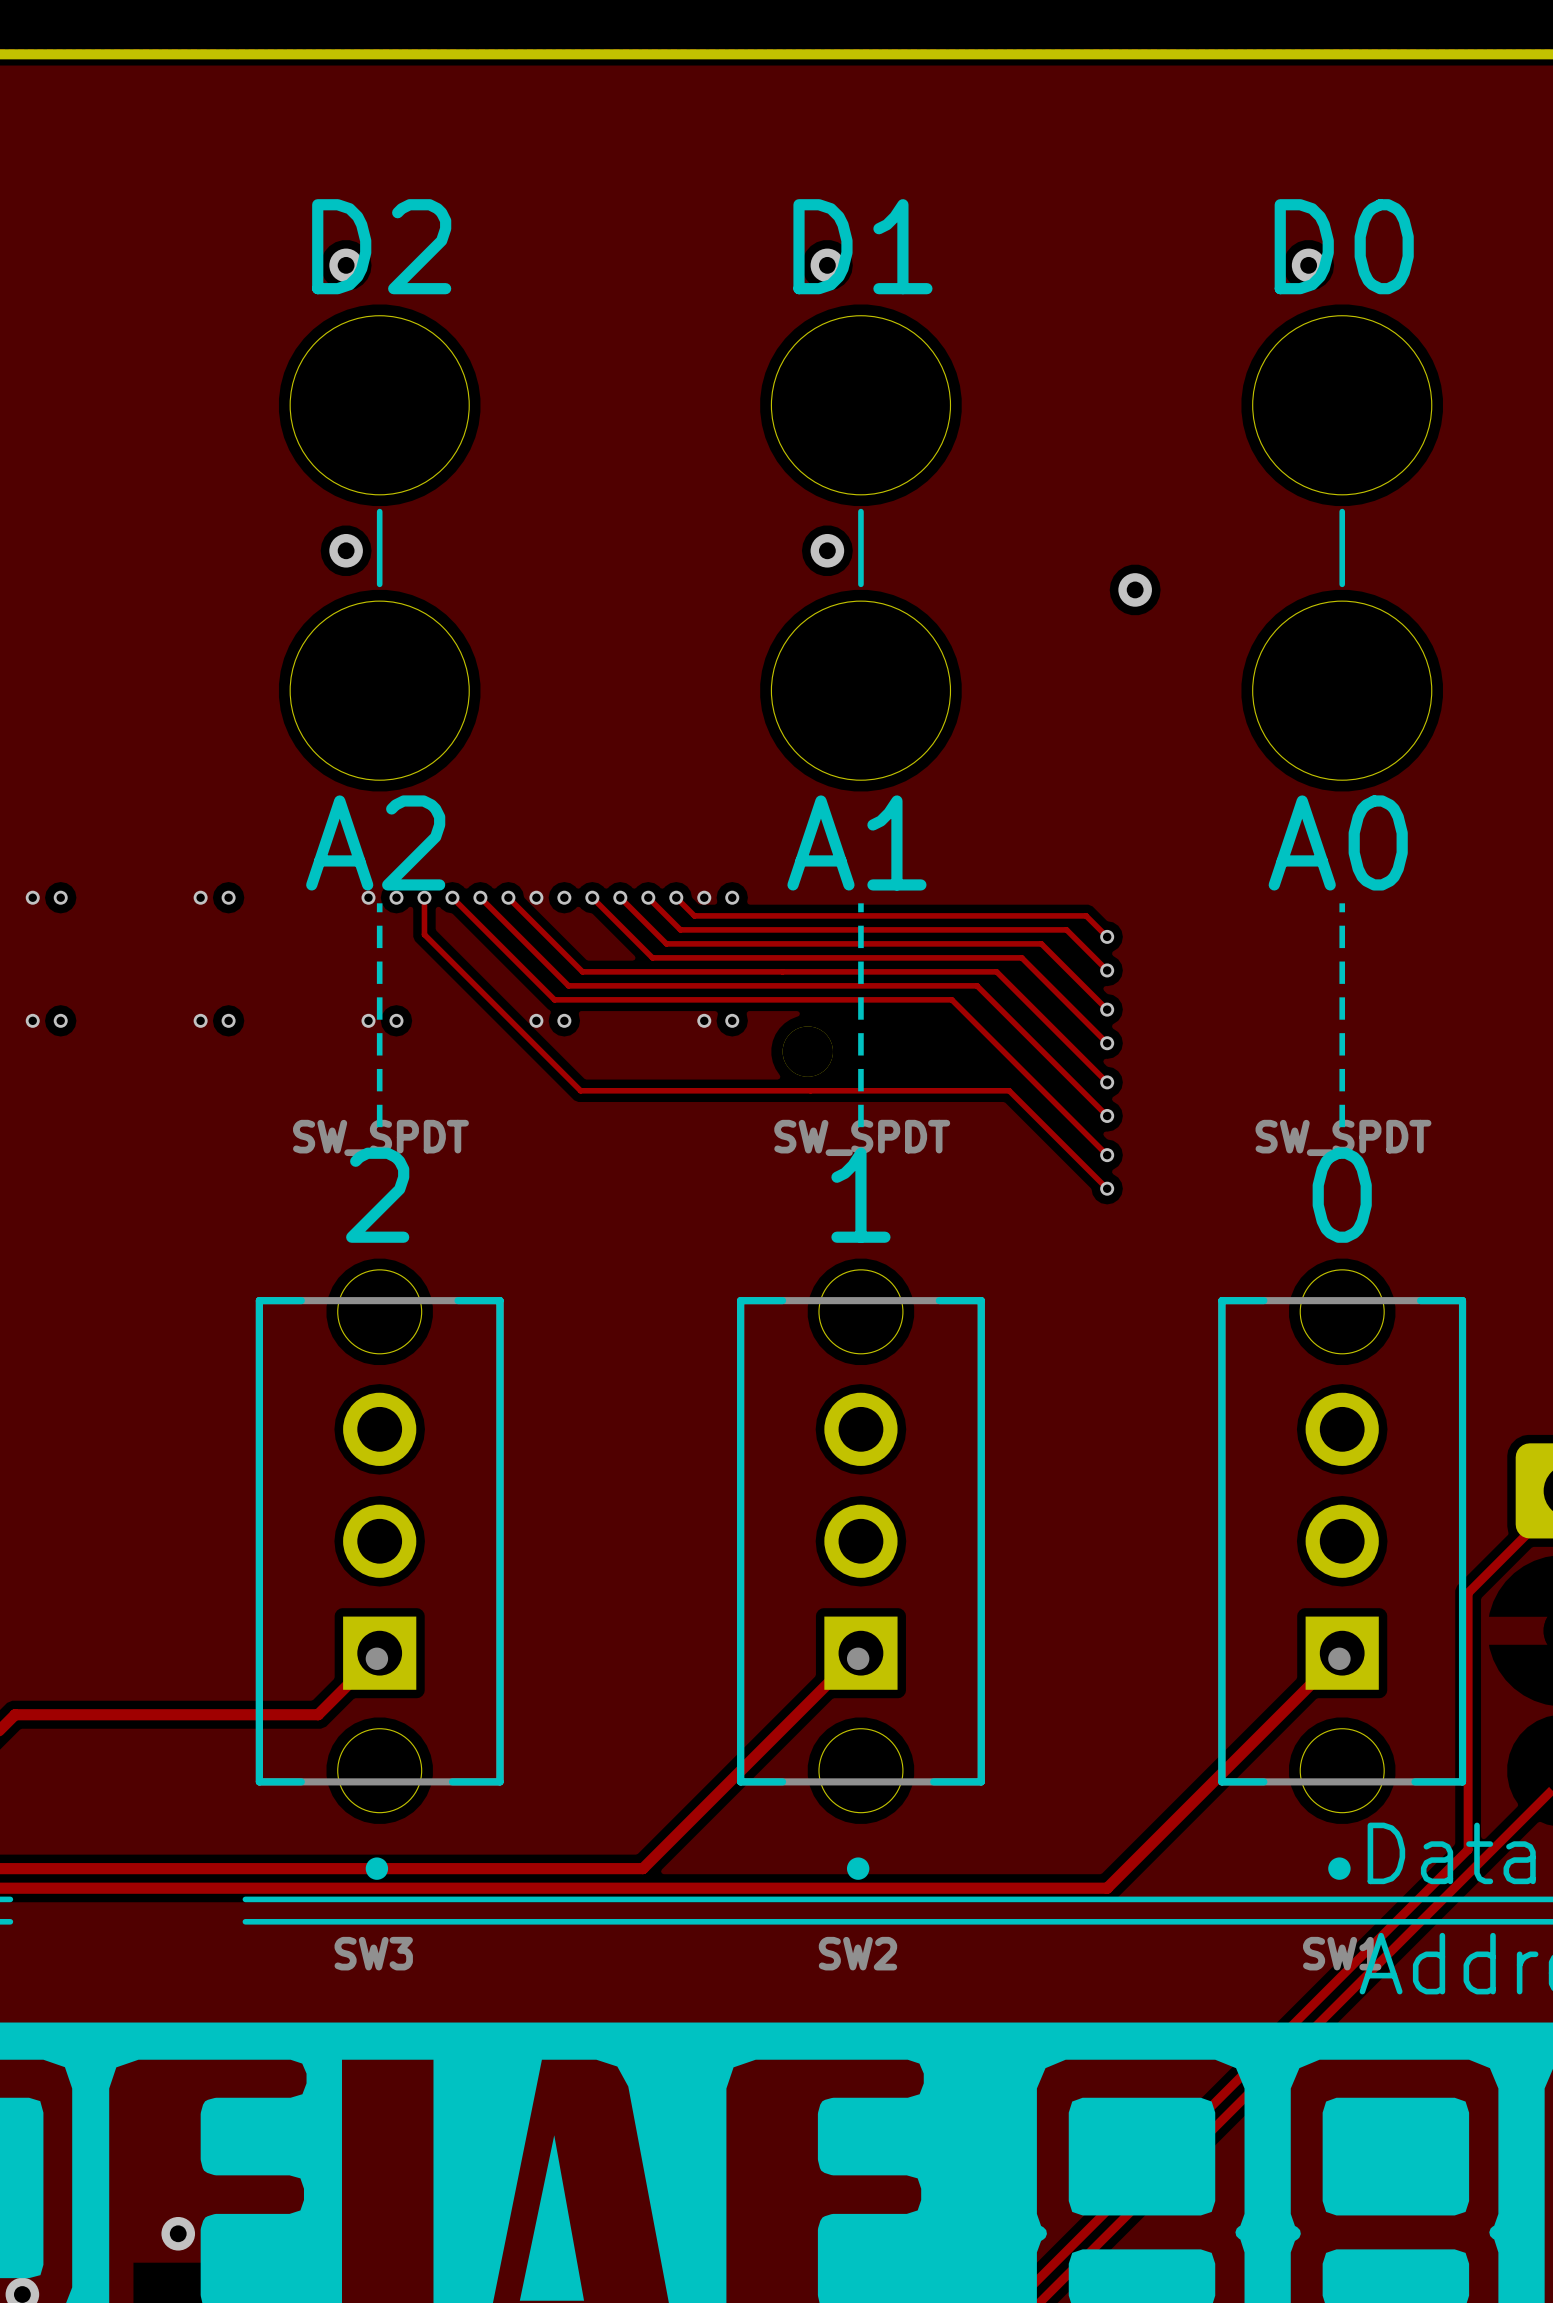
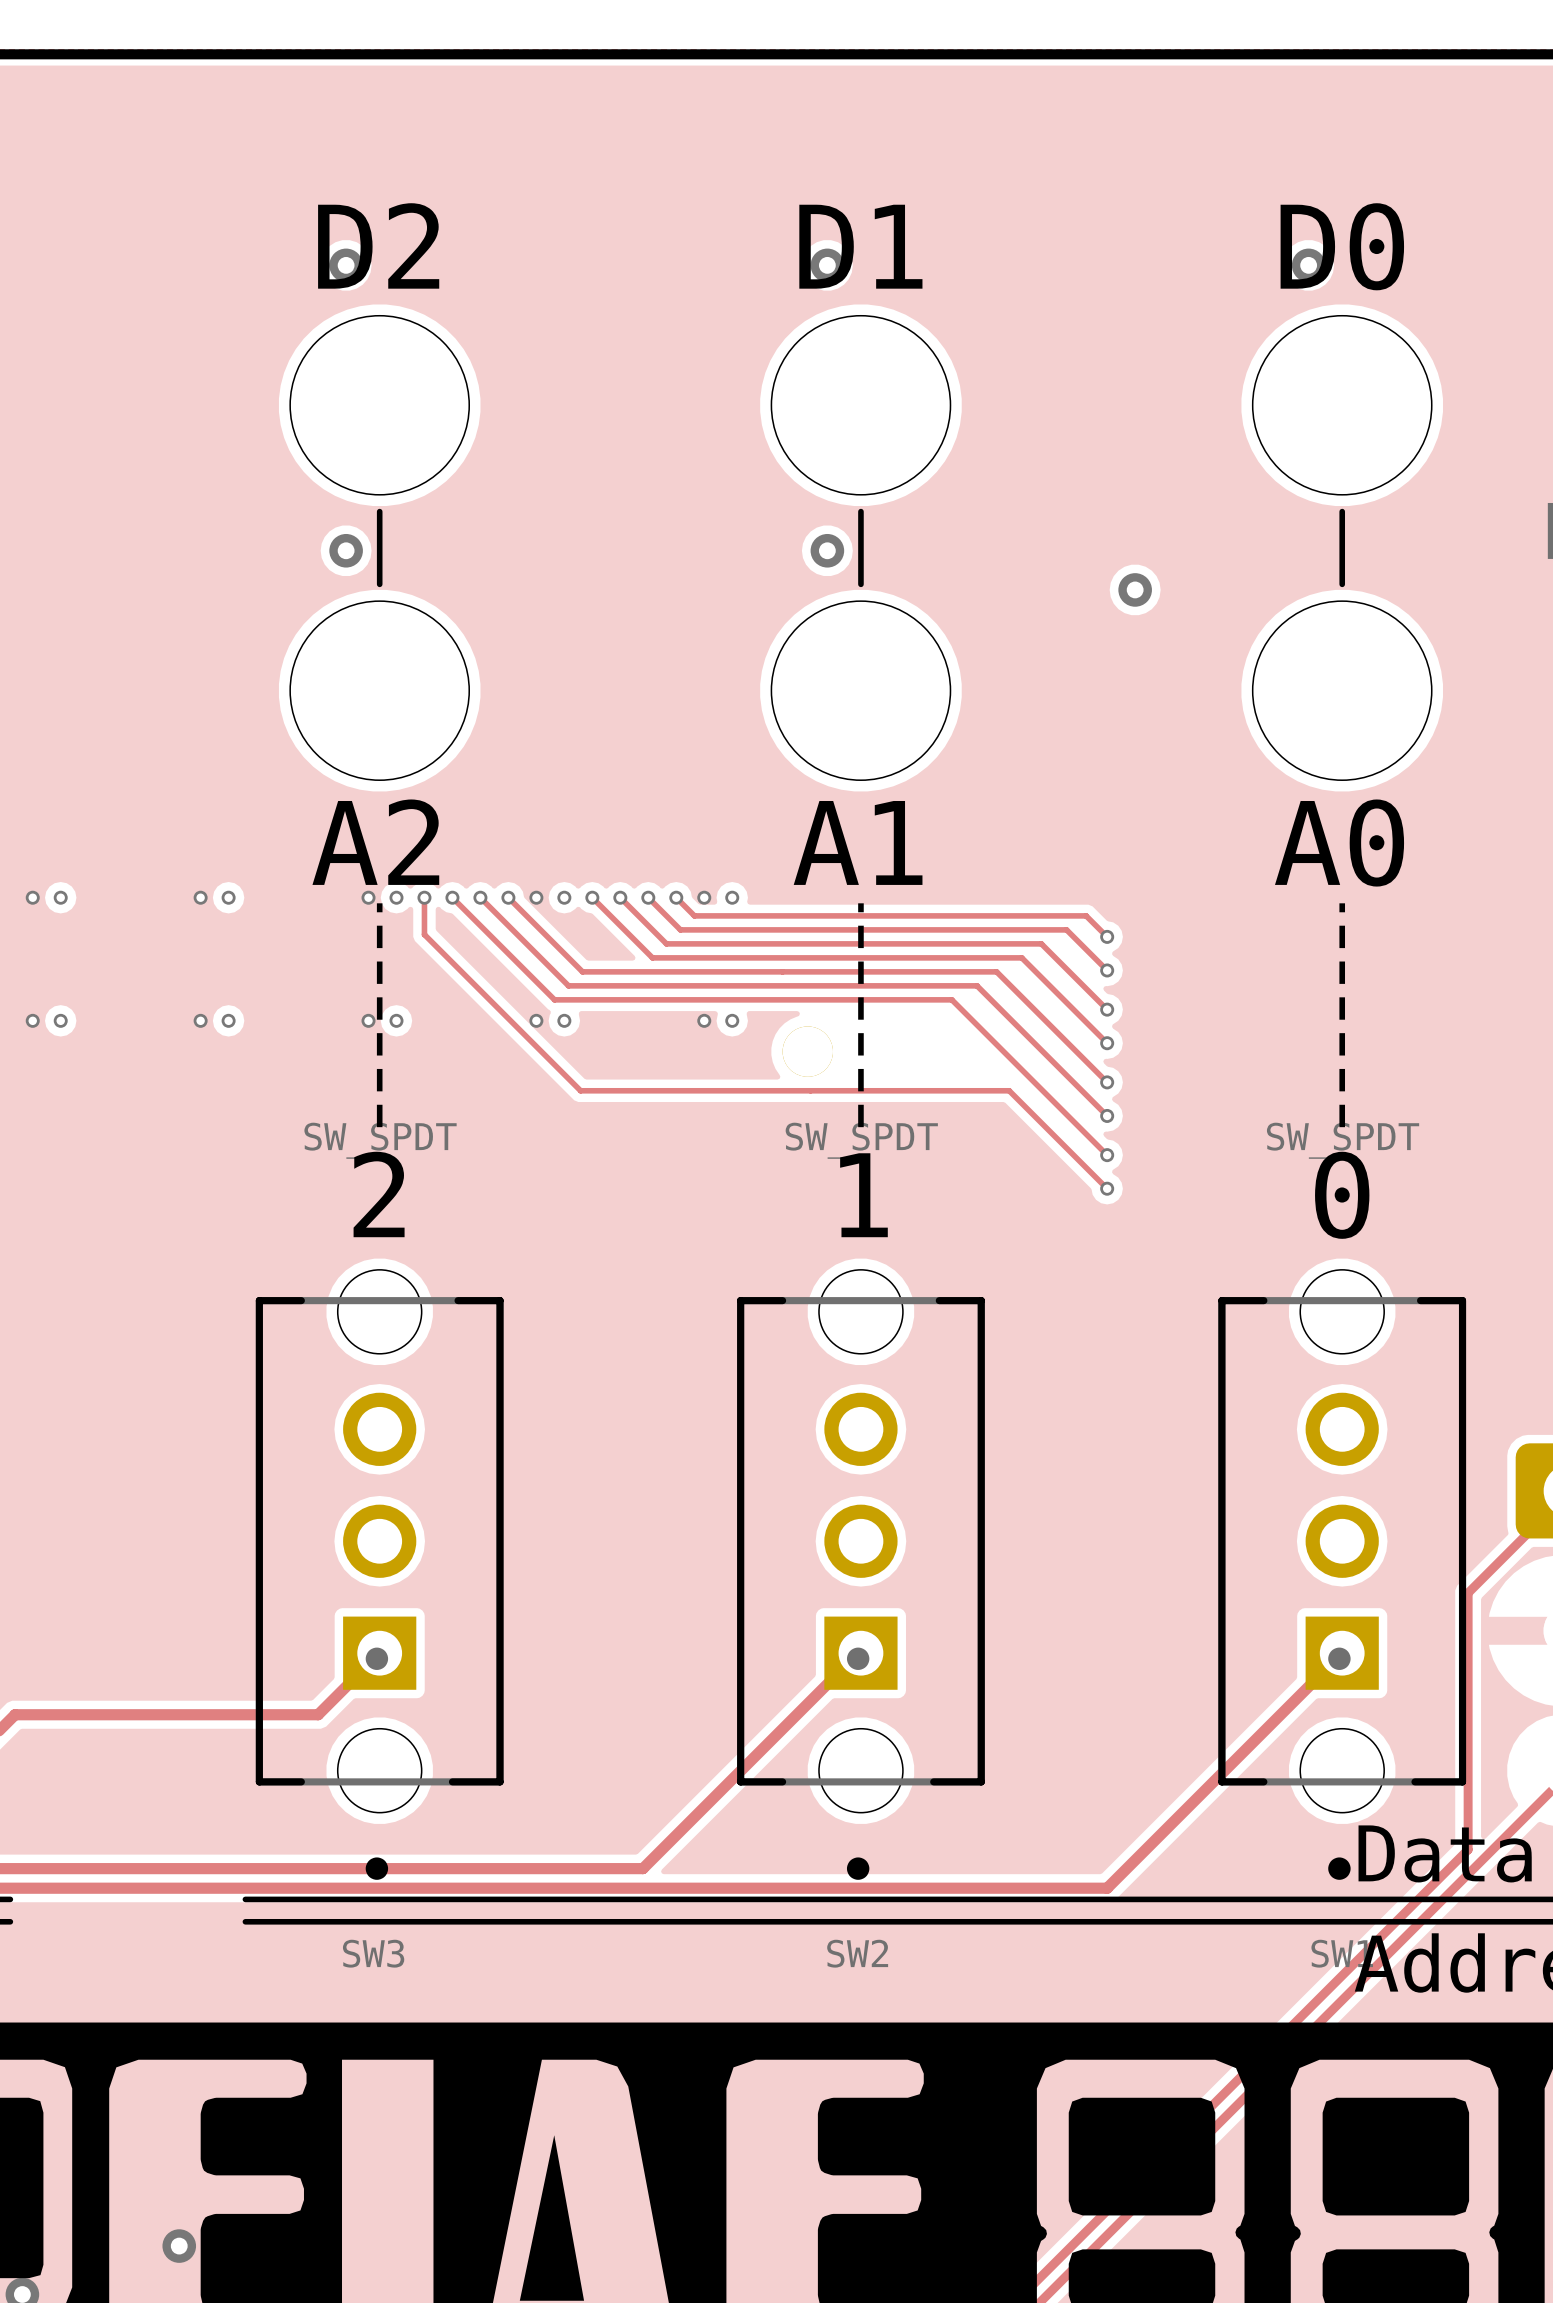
via position: (178, 2233) -> (179, 2246)

